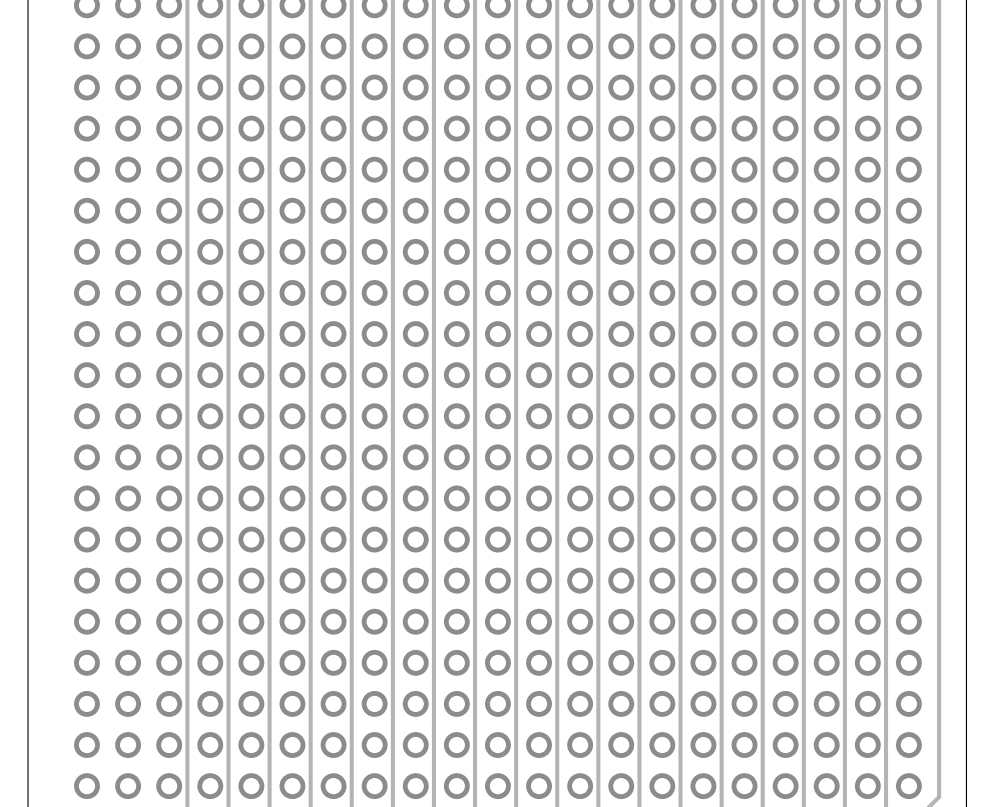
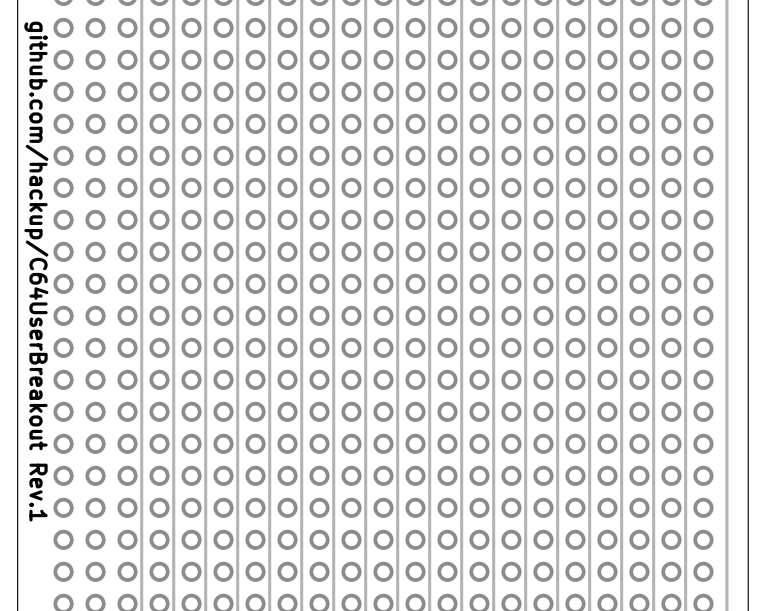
text: none -> github.com/hackup/C64UserBreakout Rev.1 (36, 271)

